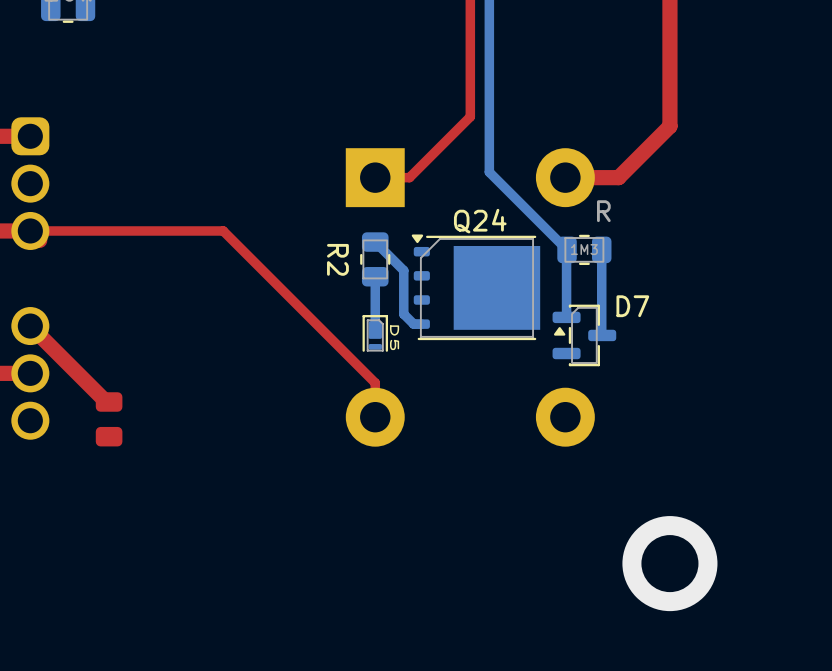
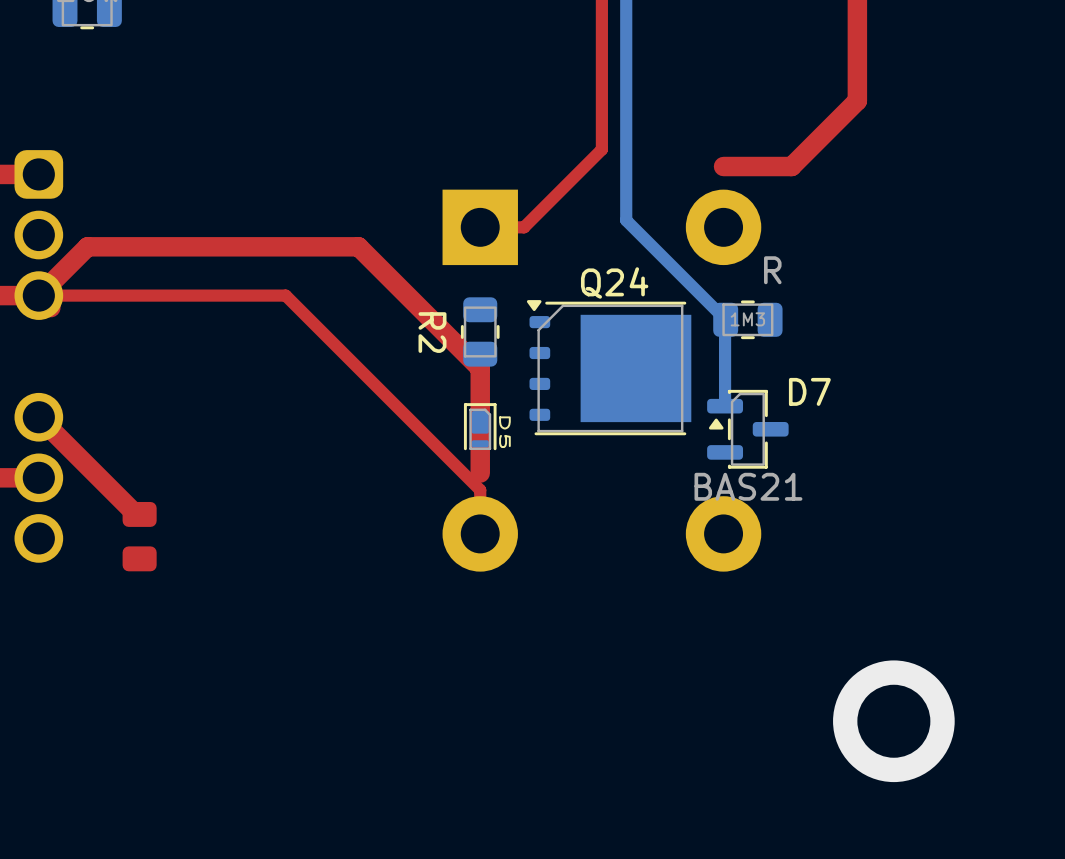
top track: (669, 78) (669, 126) (618, 177) (565, 177) -> (857, 100) (791, 166) (723, 166)
top track: none -> (38, 295) (87, 246) (358, 246) (480, 368) (480, 473)
bottom track: (375, 242) (403, 270) (403, 314) (413, 324) (421, 324) -> none
bottom track: (601, 249) (602, 335) -> none
bottom track: (375, 276) (375, 330) -> none
D7 value: none -> BAS21 (748, 486)
via position: (669, 563) -> (893, 721)

